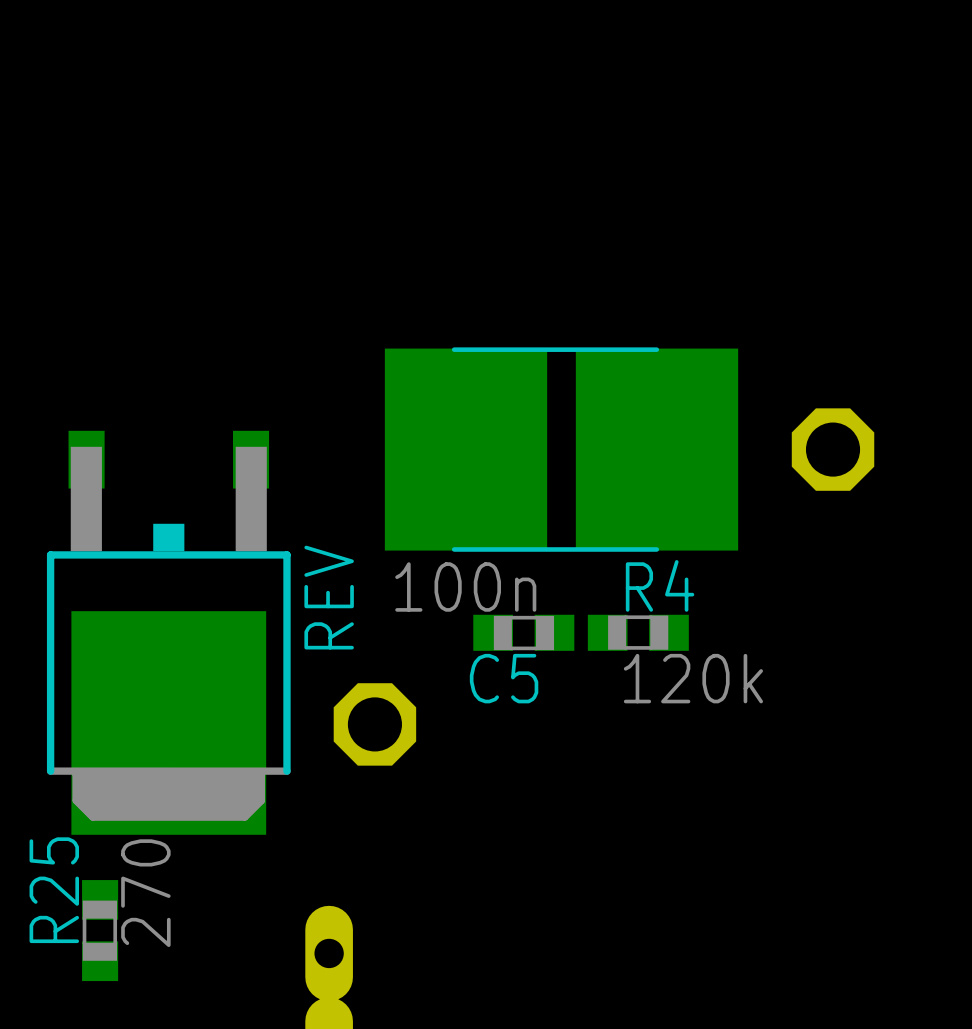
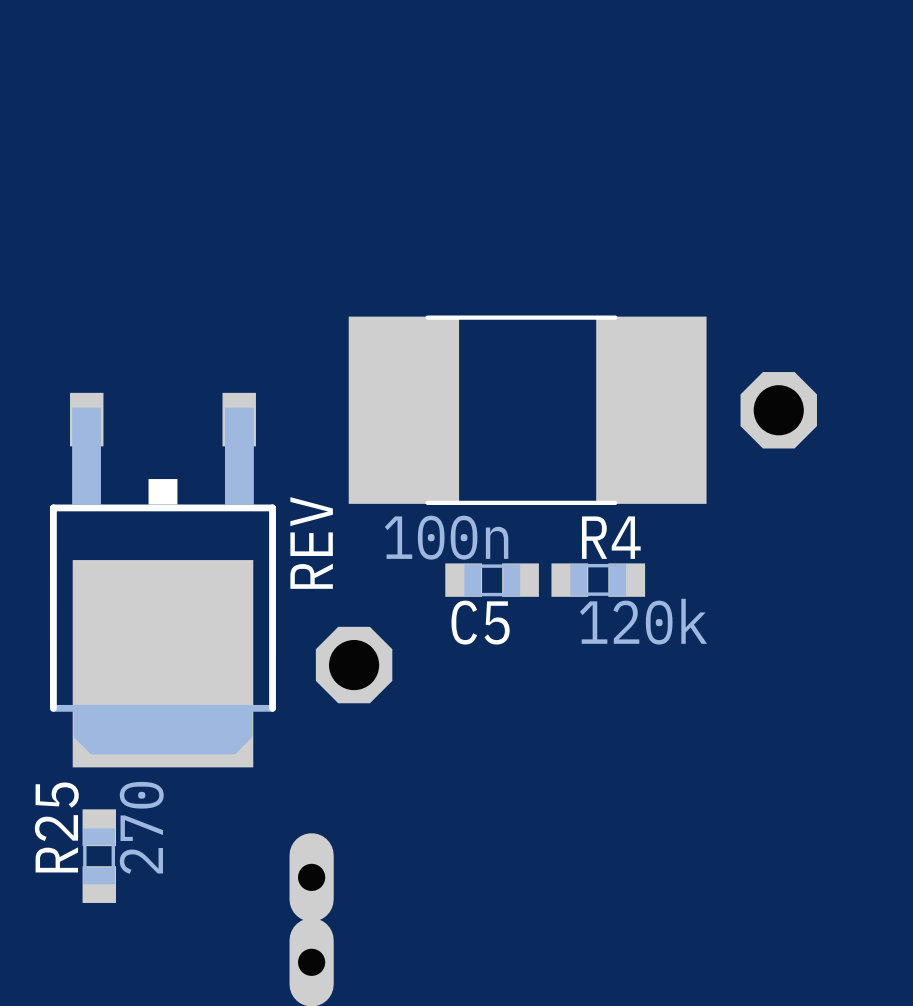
part footprint: [384, 347, 739, 552] -> [348, 315, 707, 506]

